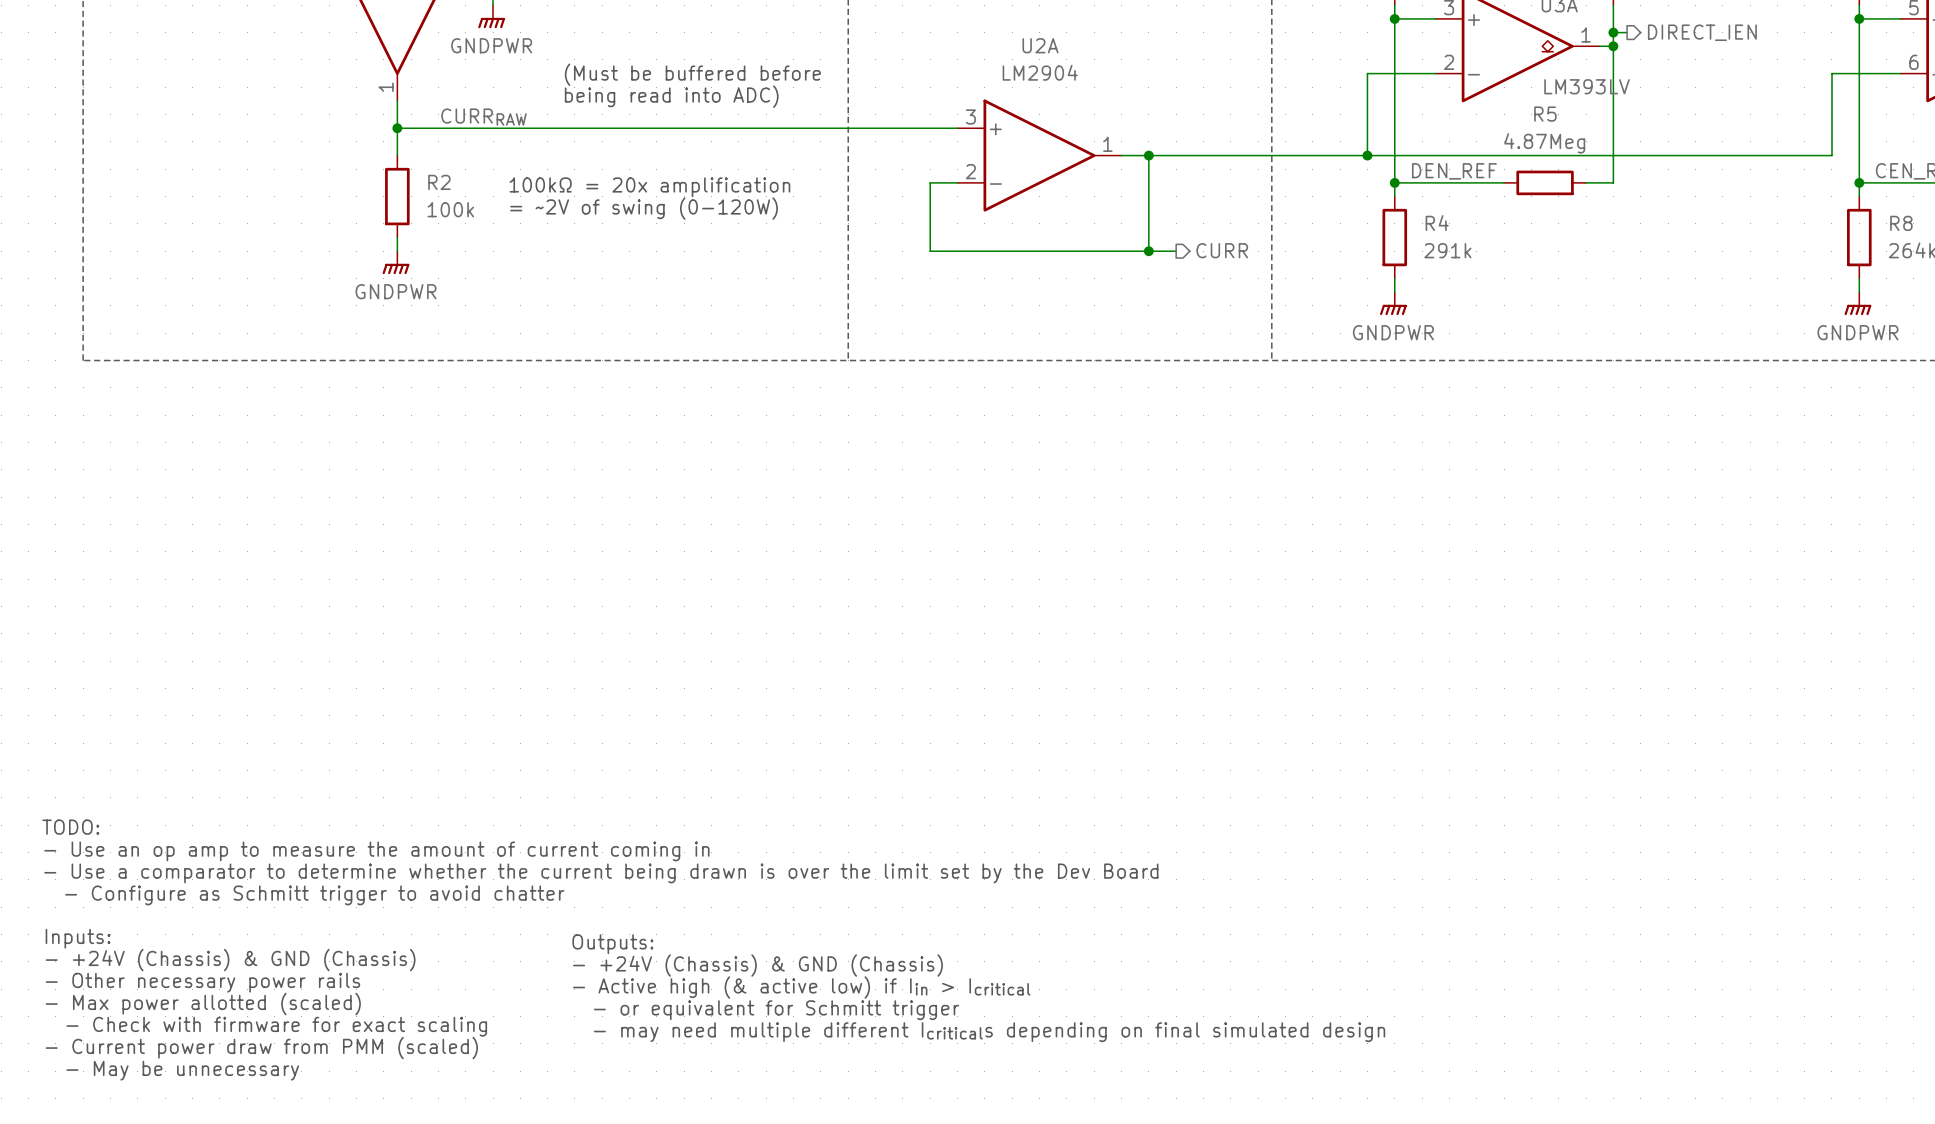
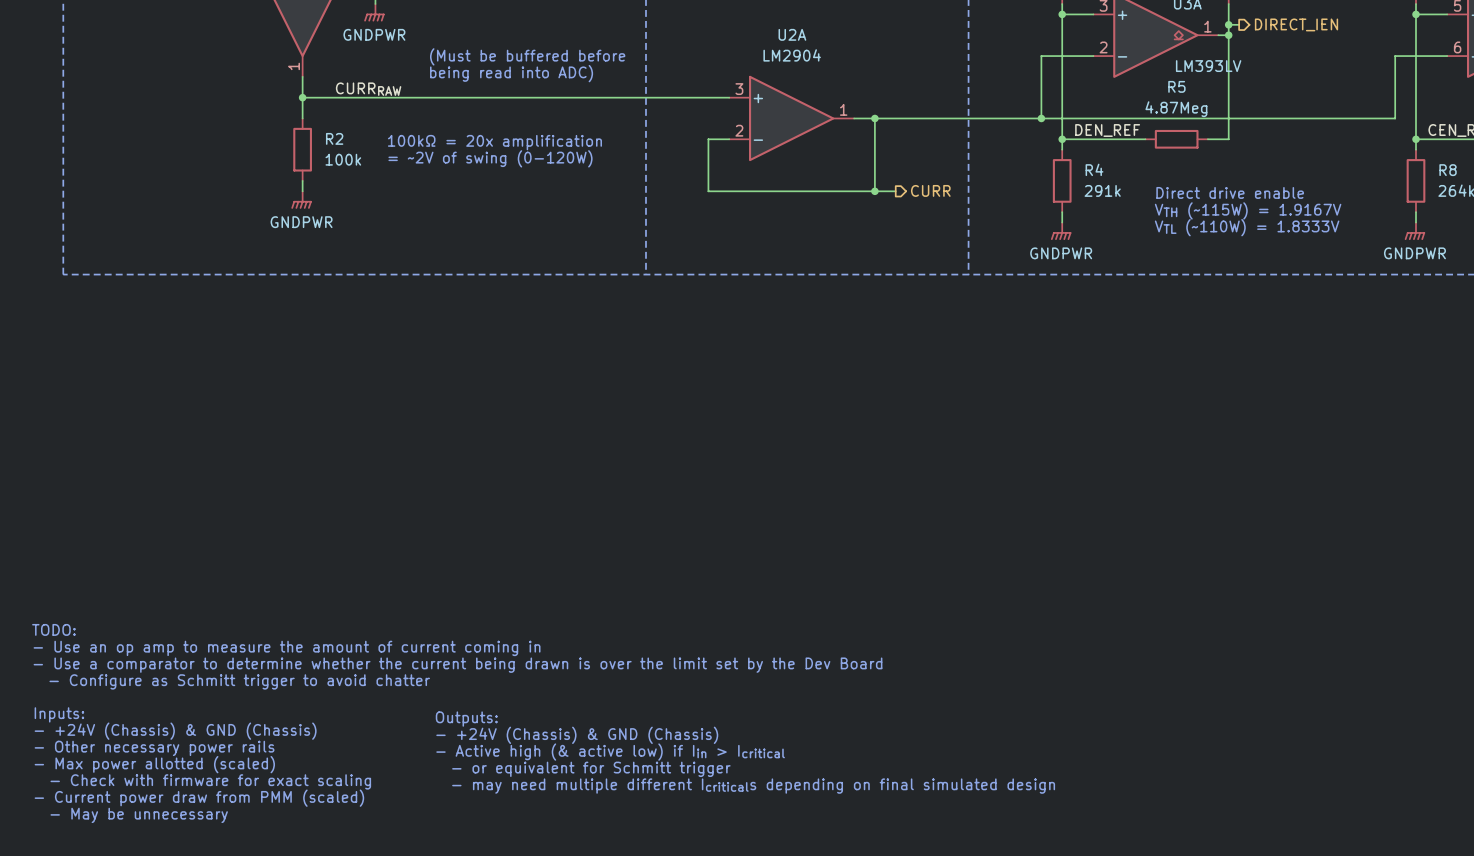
text: none -> Direct drive enable (1230, 192)
text: none -> VTH (~115W) = 1.9167V (1248, 210)
text: none -> VTL (~110W) = 1.8333V (1247, 227)

